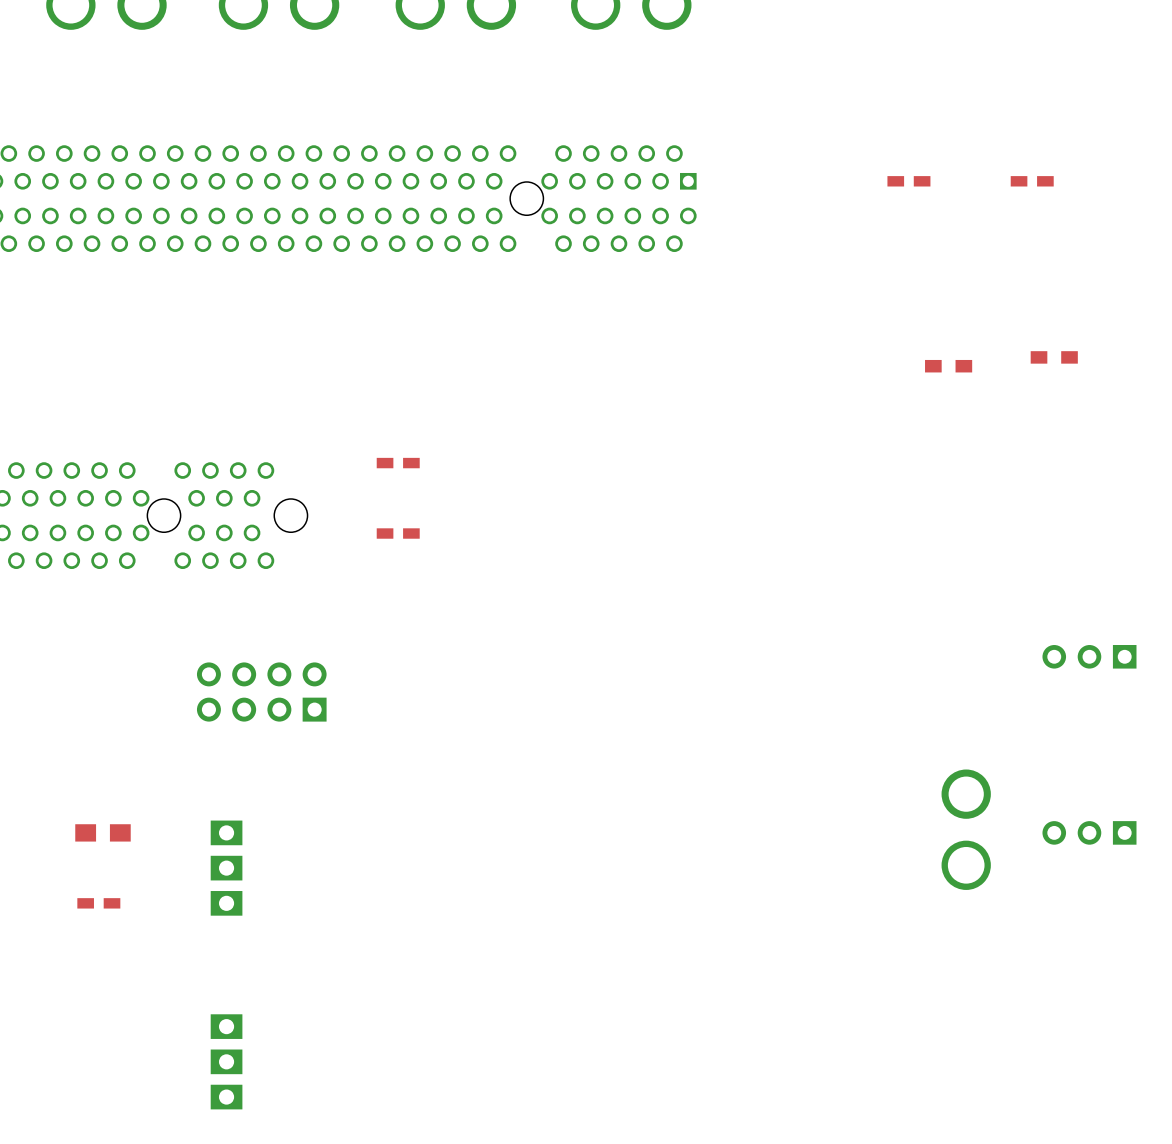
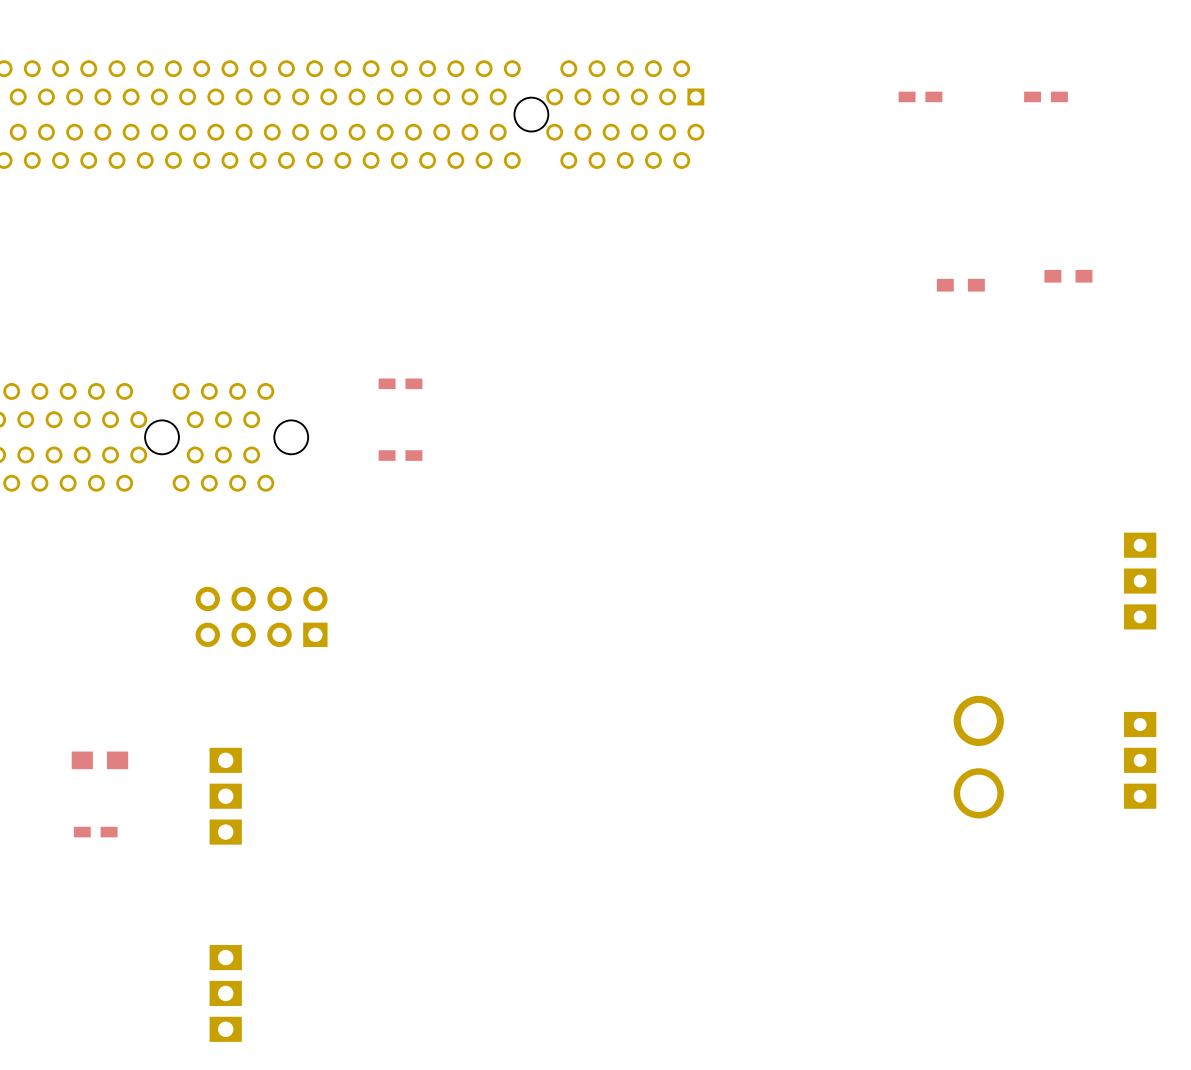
part: (1089, 656) -> none
part: none -> (1140, 581)
part: (1089, 832) -> none
part: none -> (1140, 760)

